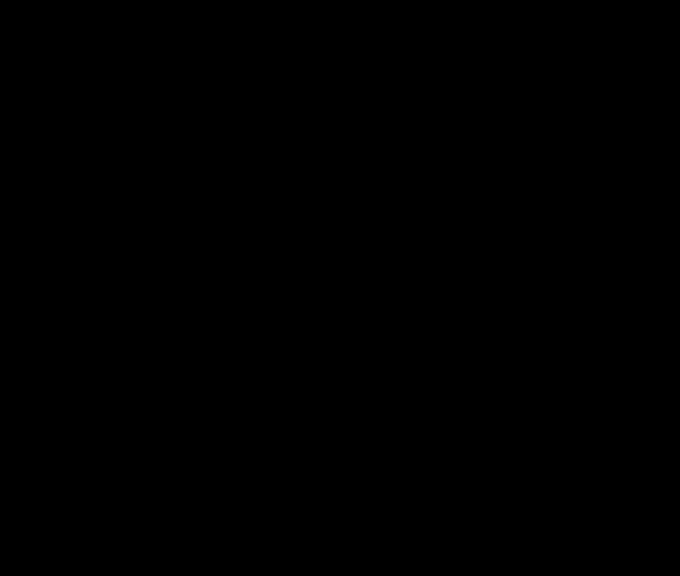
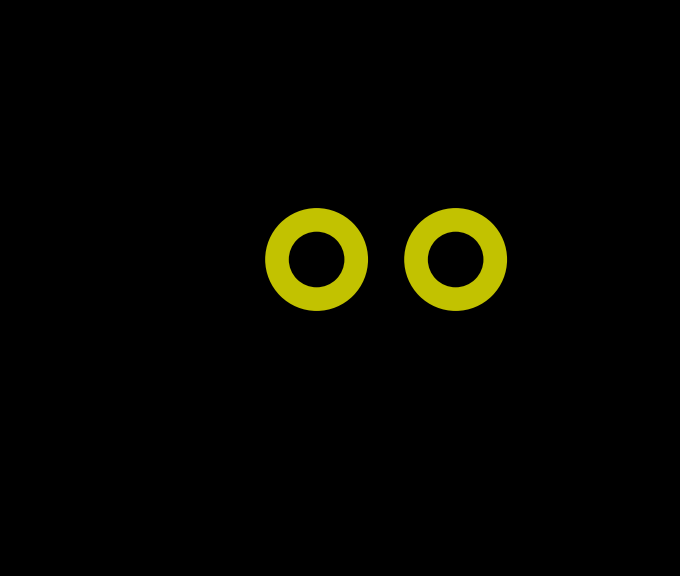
part: none -> (386, 259)

